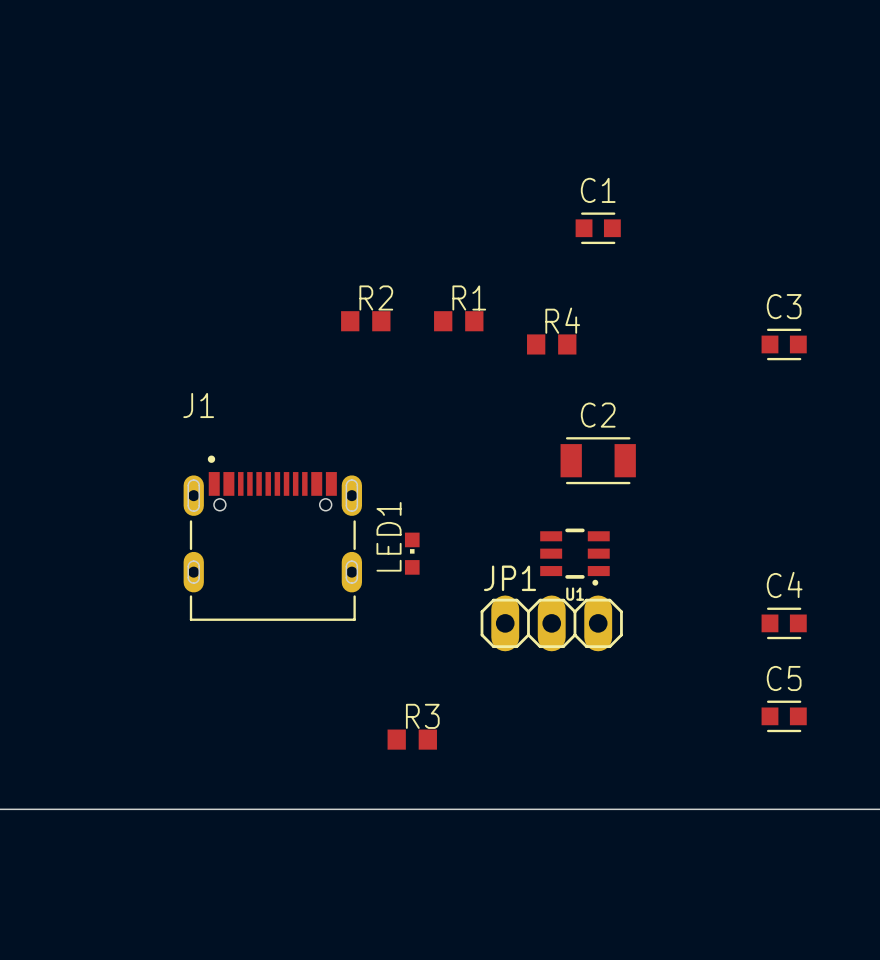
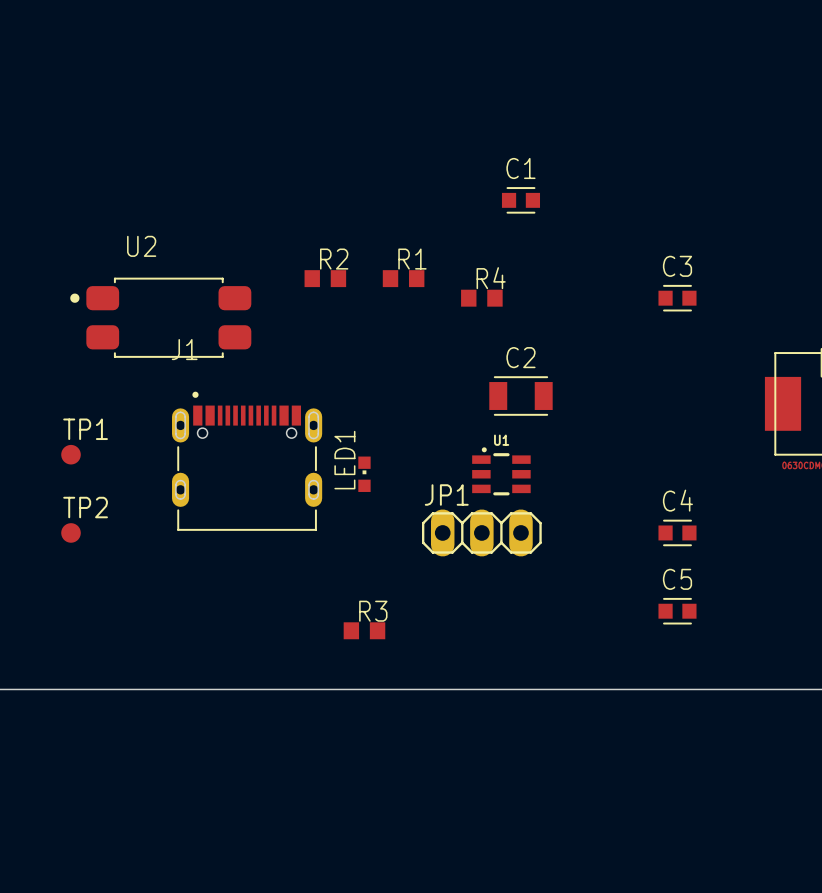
U2: none -> (160, 317)
TP1: none -> (71, 454)
U1 rotation: 0° (574, 557) -> 180° (501, 471)
TP2: none -> (71, 532)

